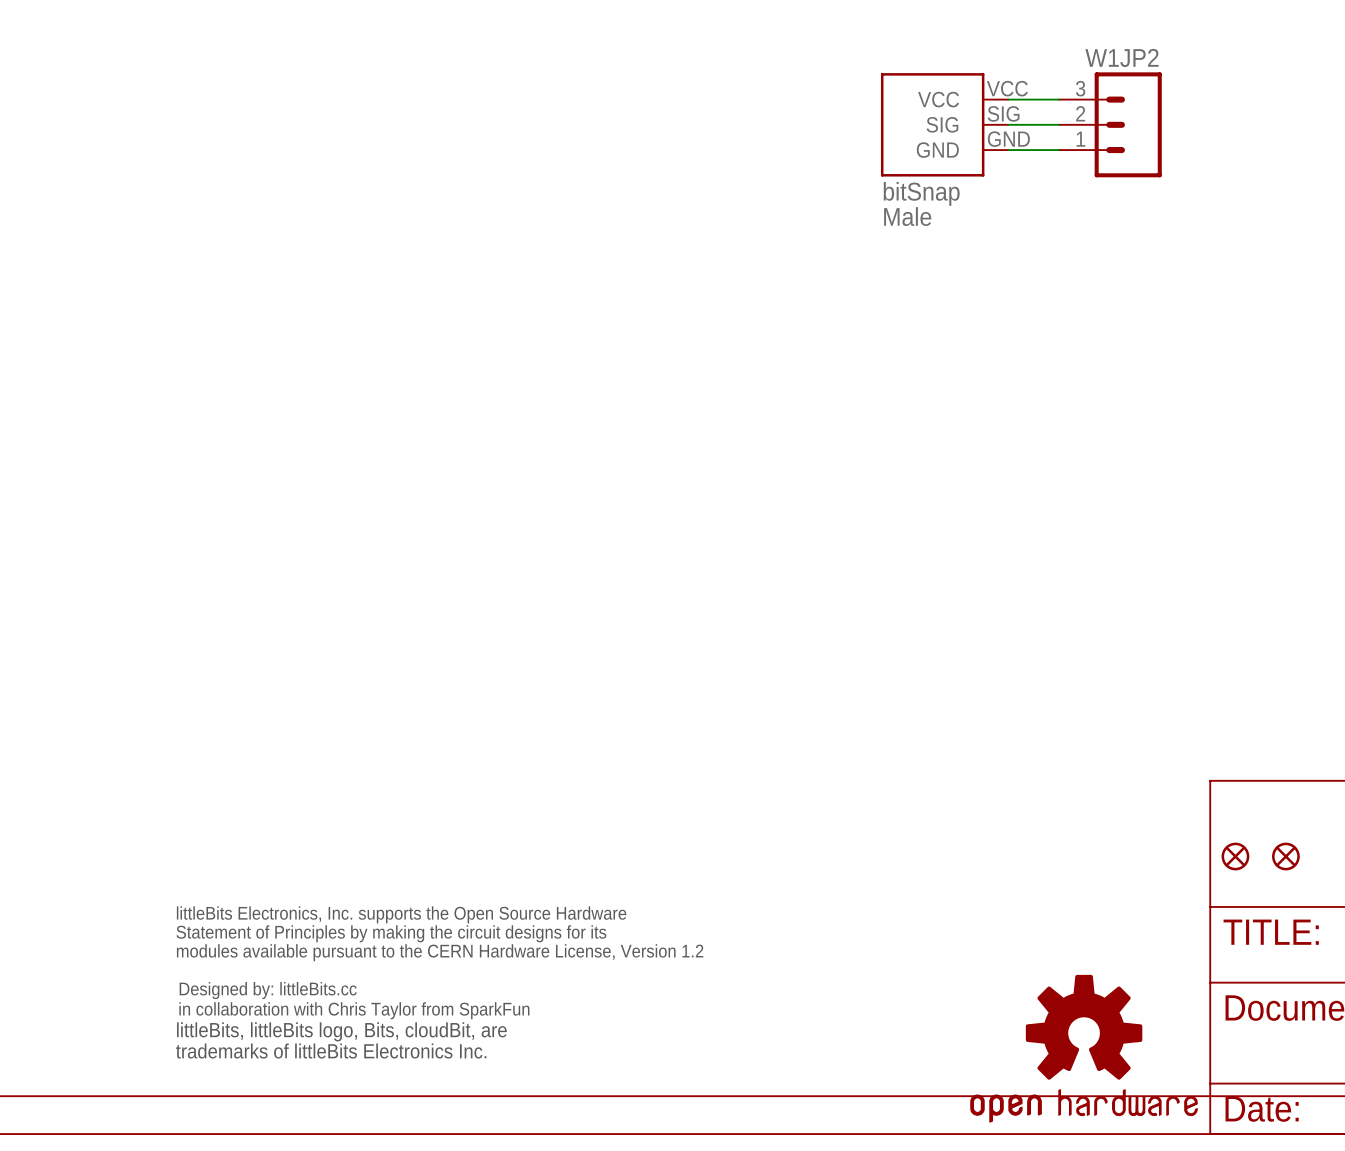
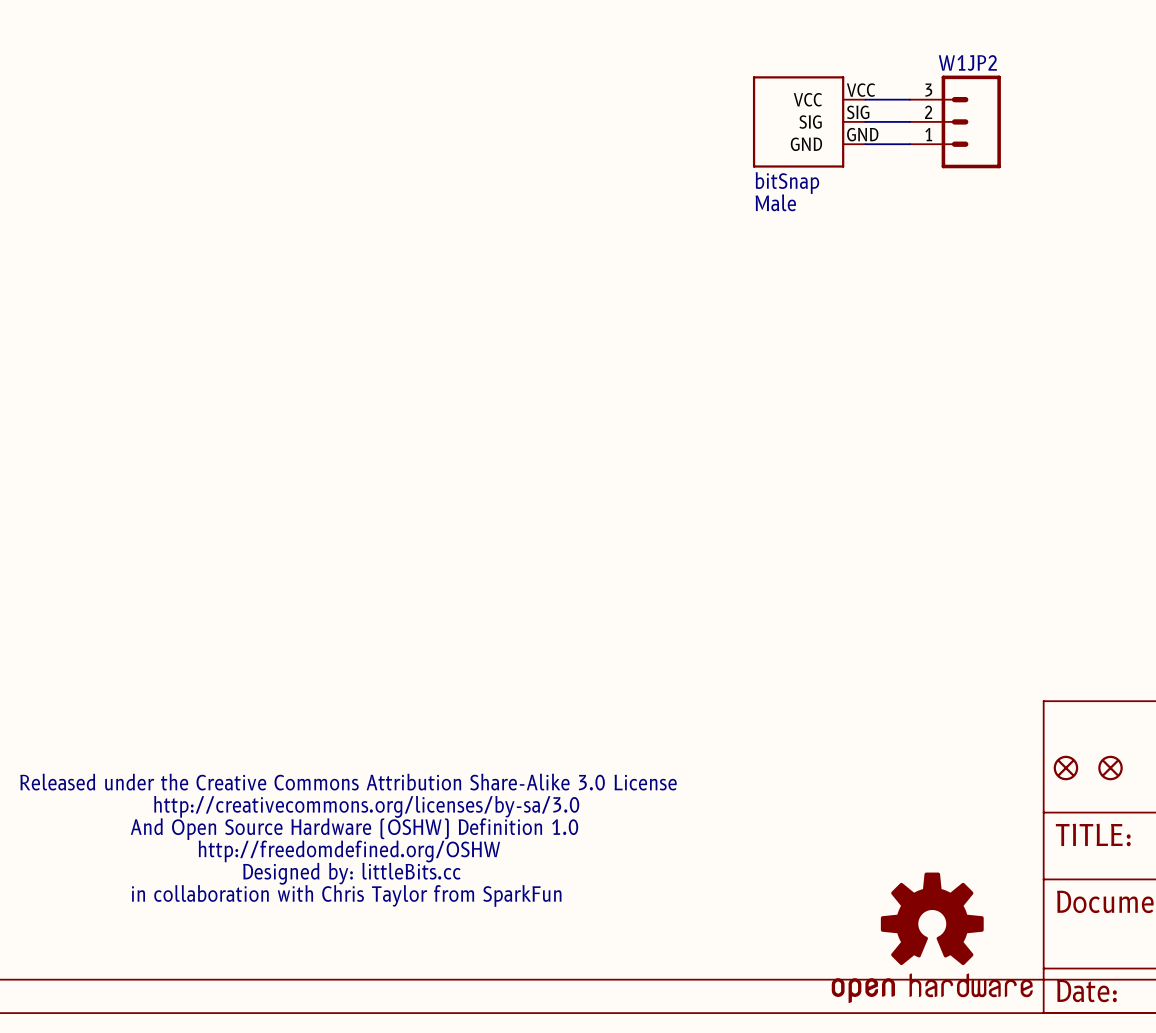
part: none -> (348, 840)
part: (439, 982) -> none
text: in collaboration with Chris Taylor from SparkFun (354, 1010) -> none

